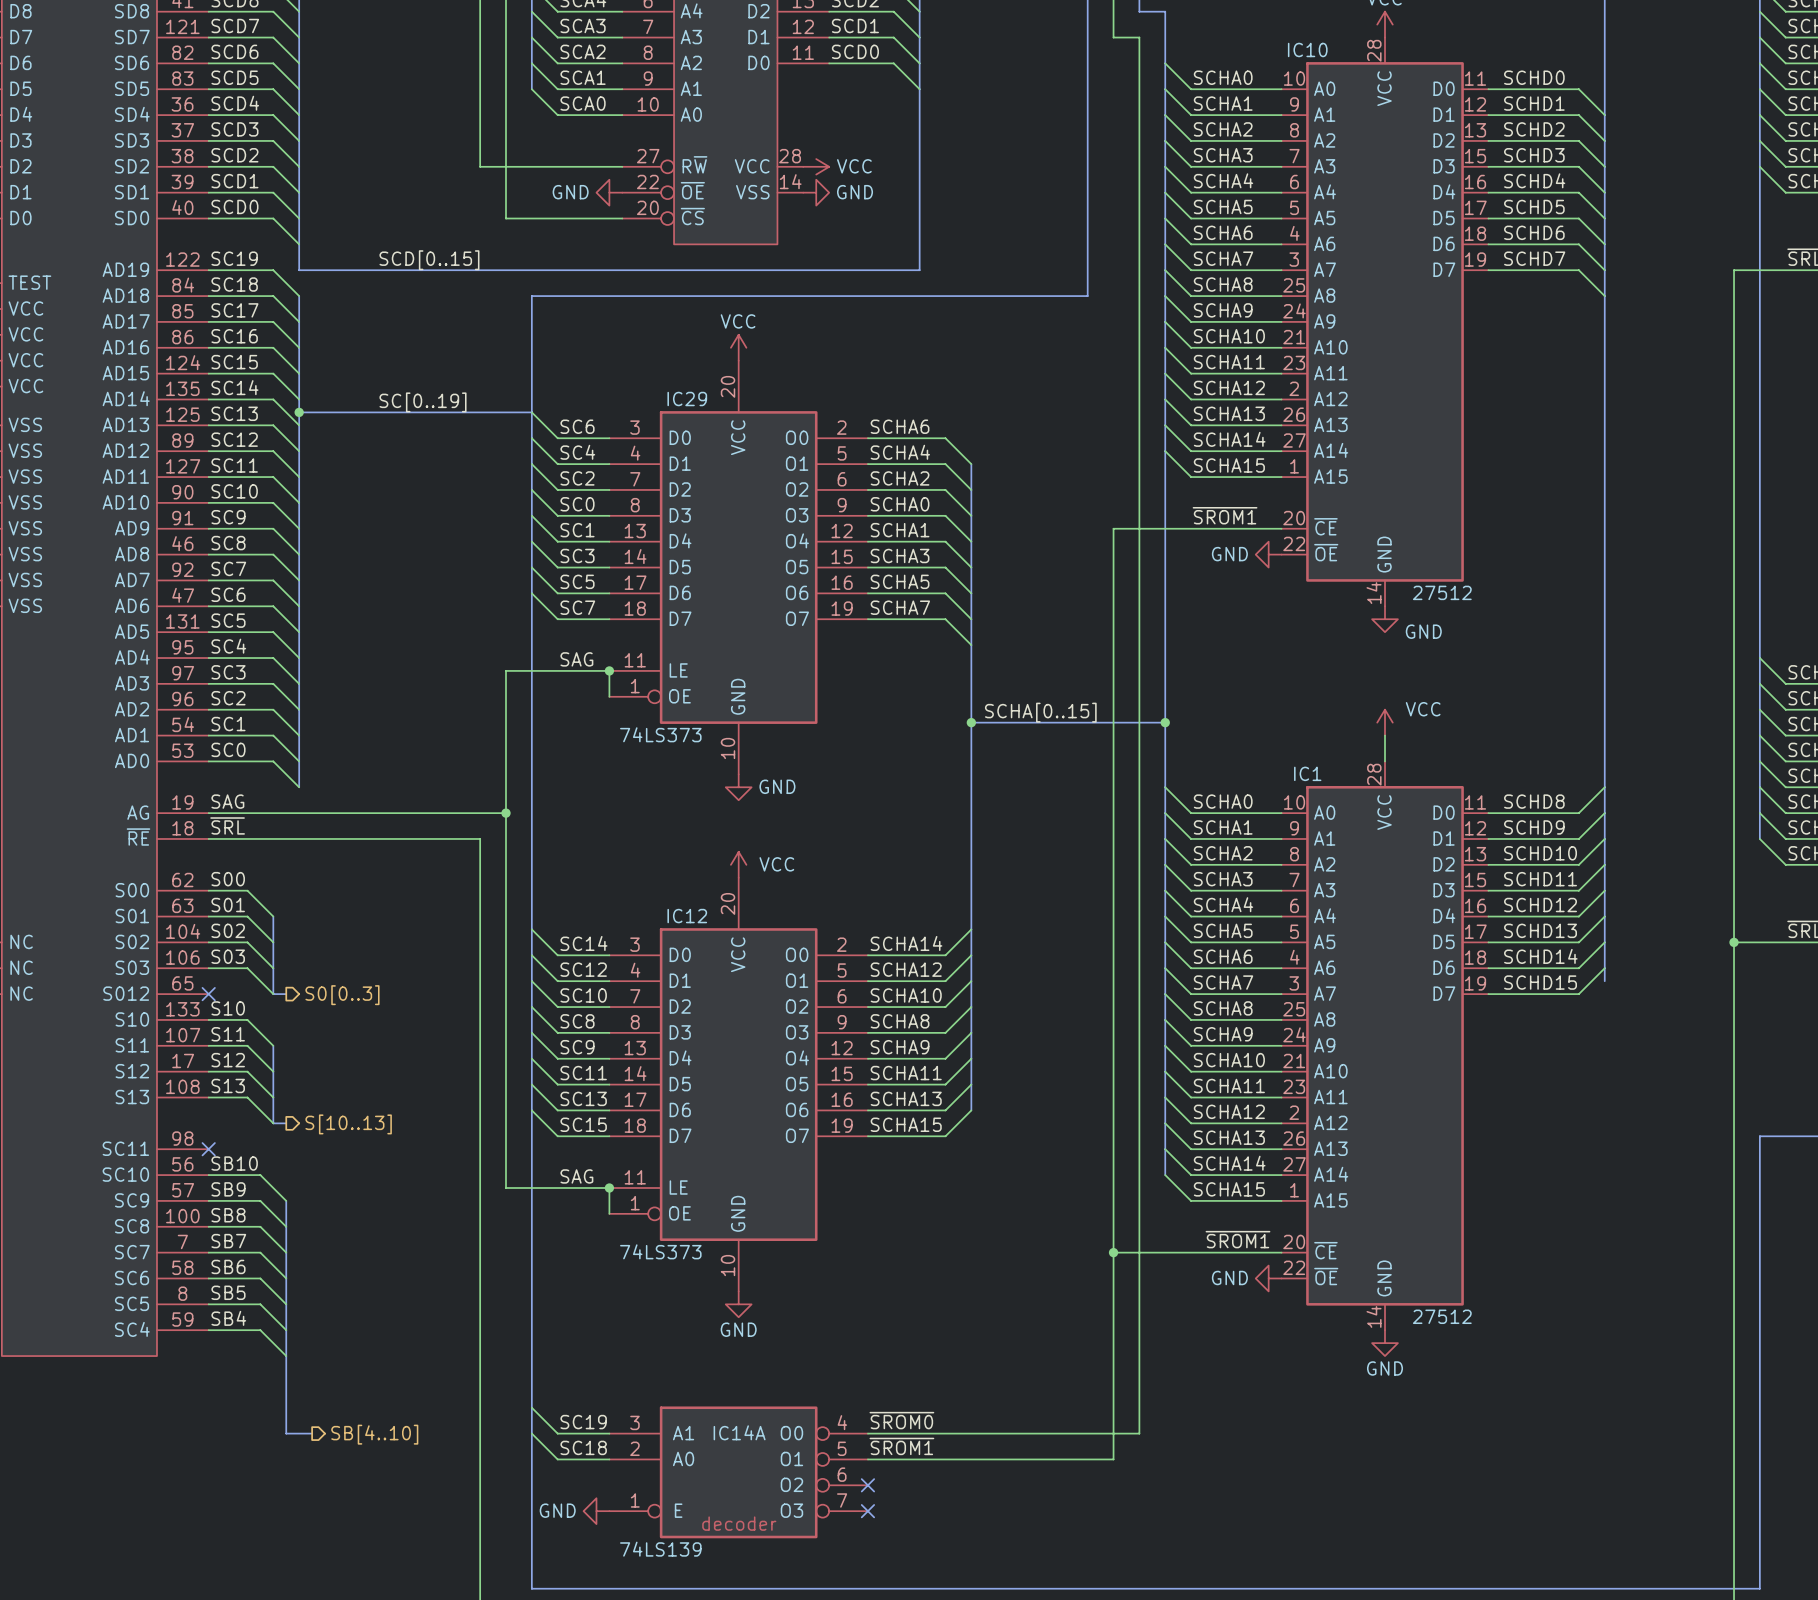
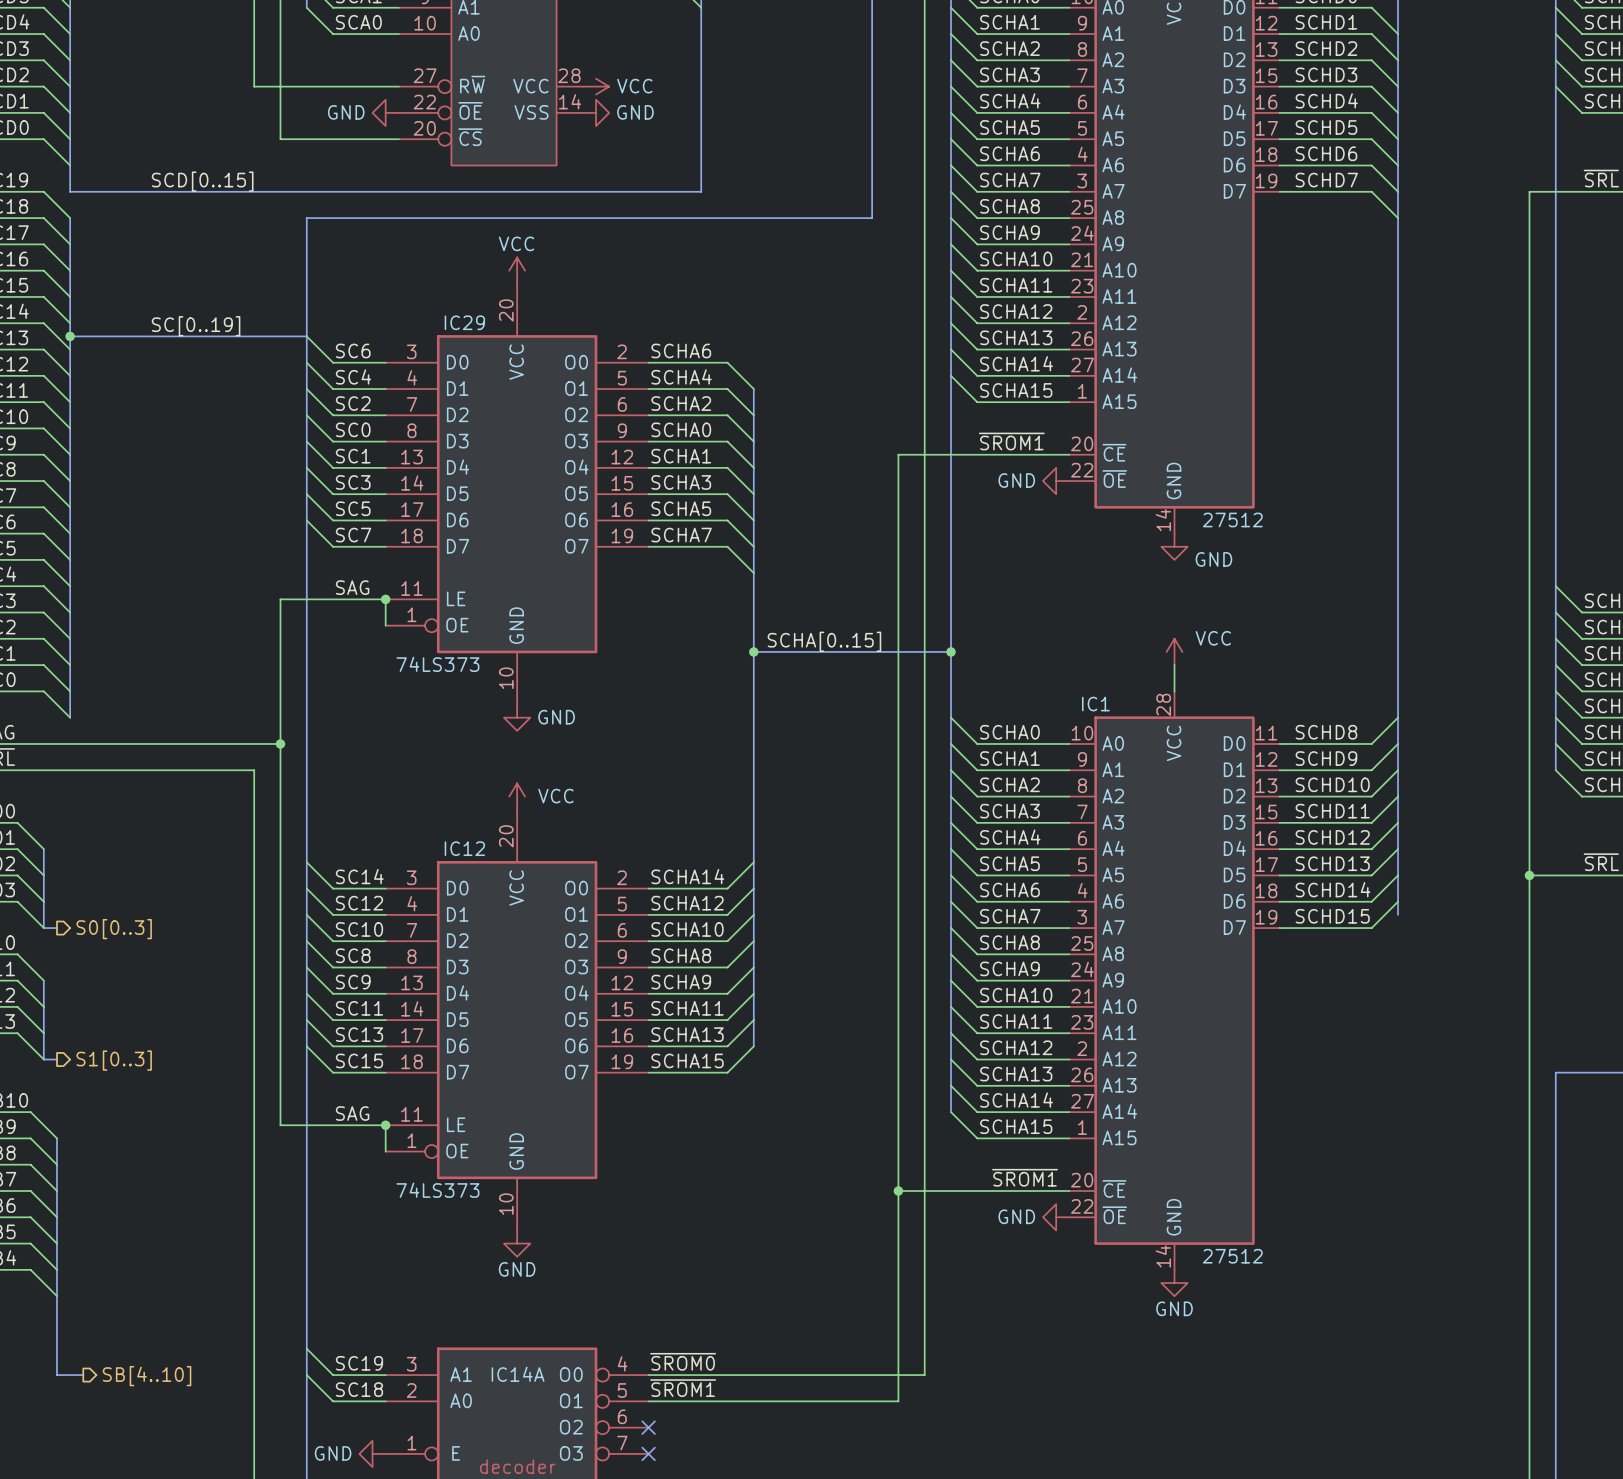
hierarchical label: S[10..13] (348, 1124) -> S1[0..3] (114, 1060)

